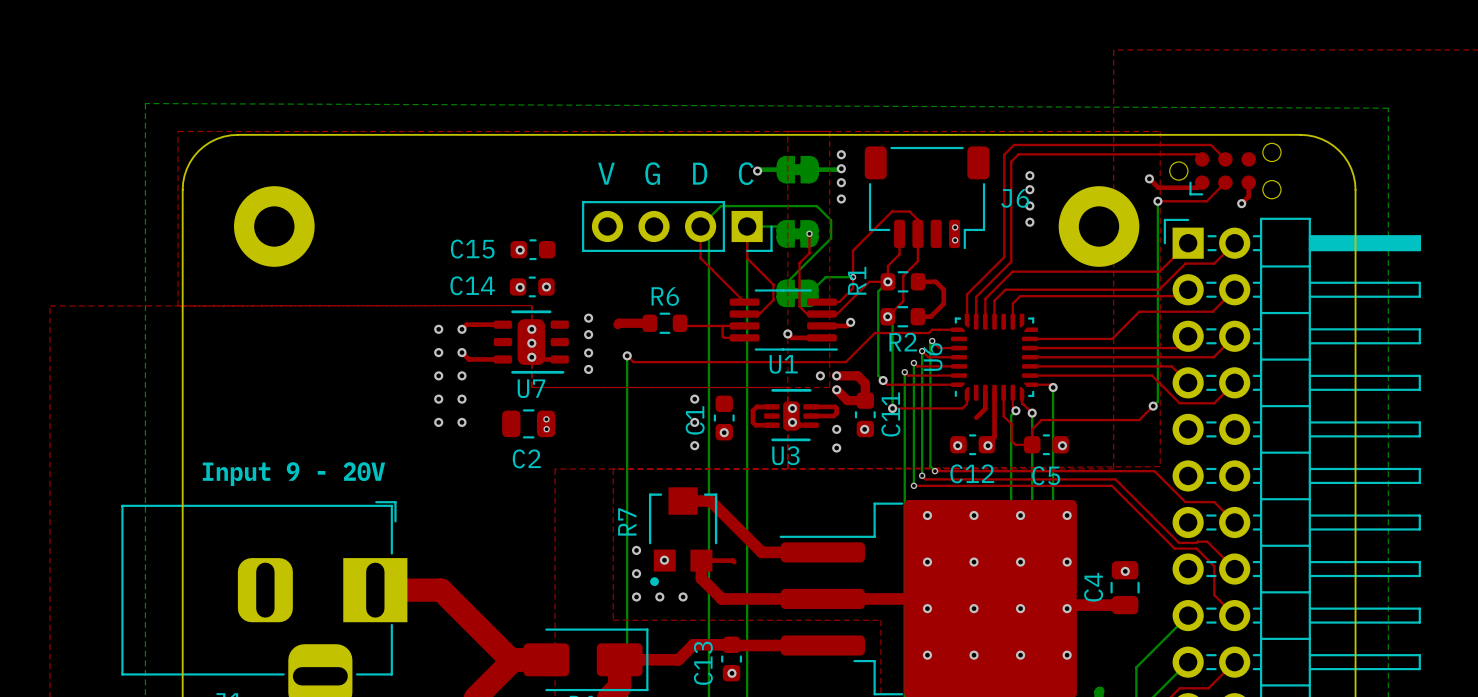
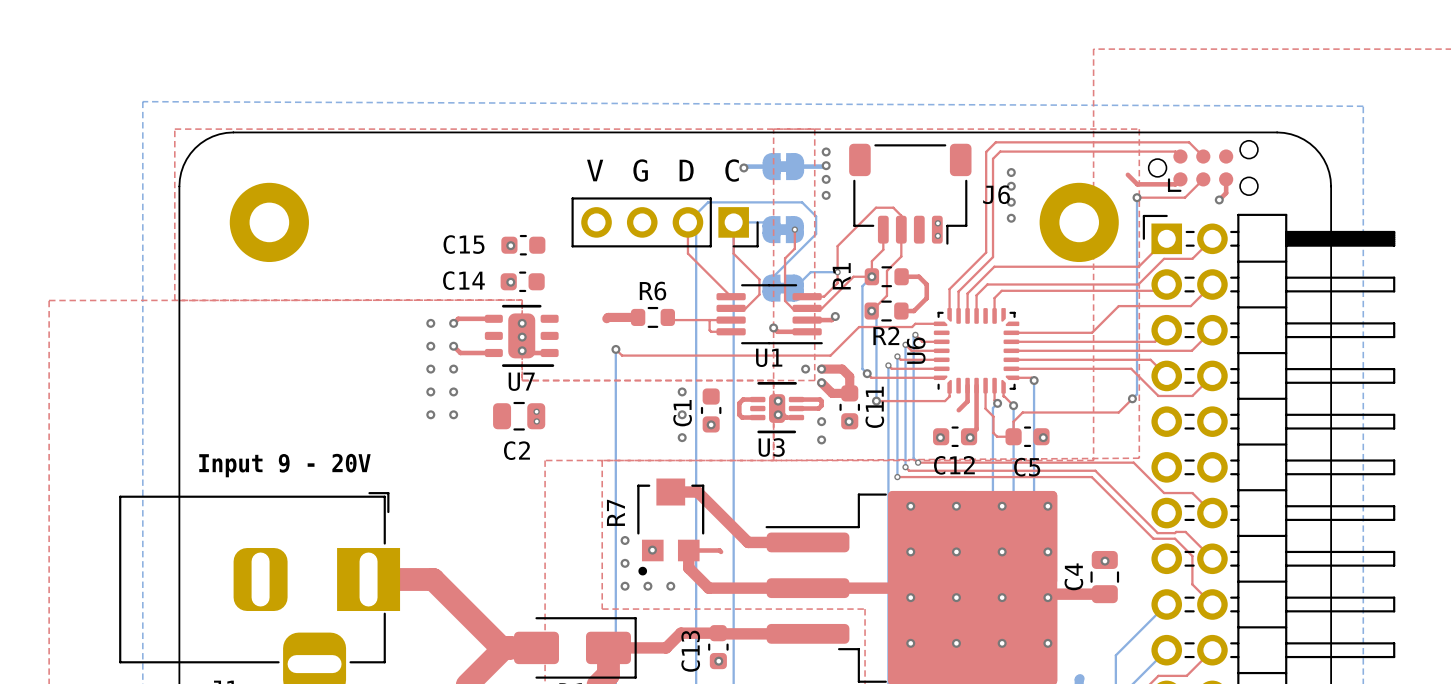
via: (1149, 178) -> none
via: (546, 286) -> none
via: (588, 318) -> none
via: (588, 334) -> none
via: (588, 352) -> none
via: (588, 369) -> none

